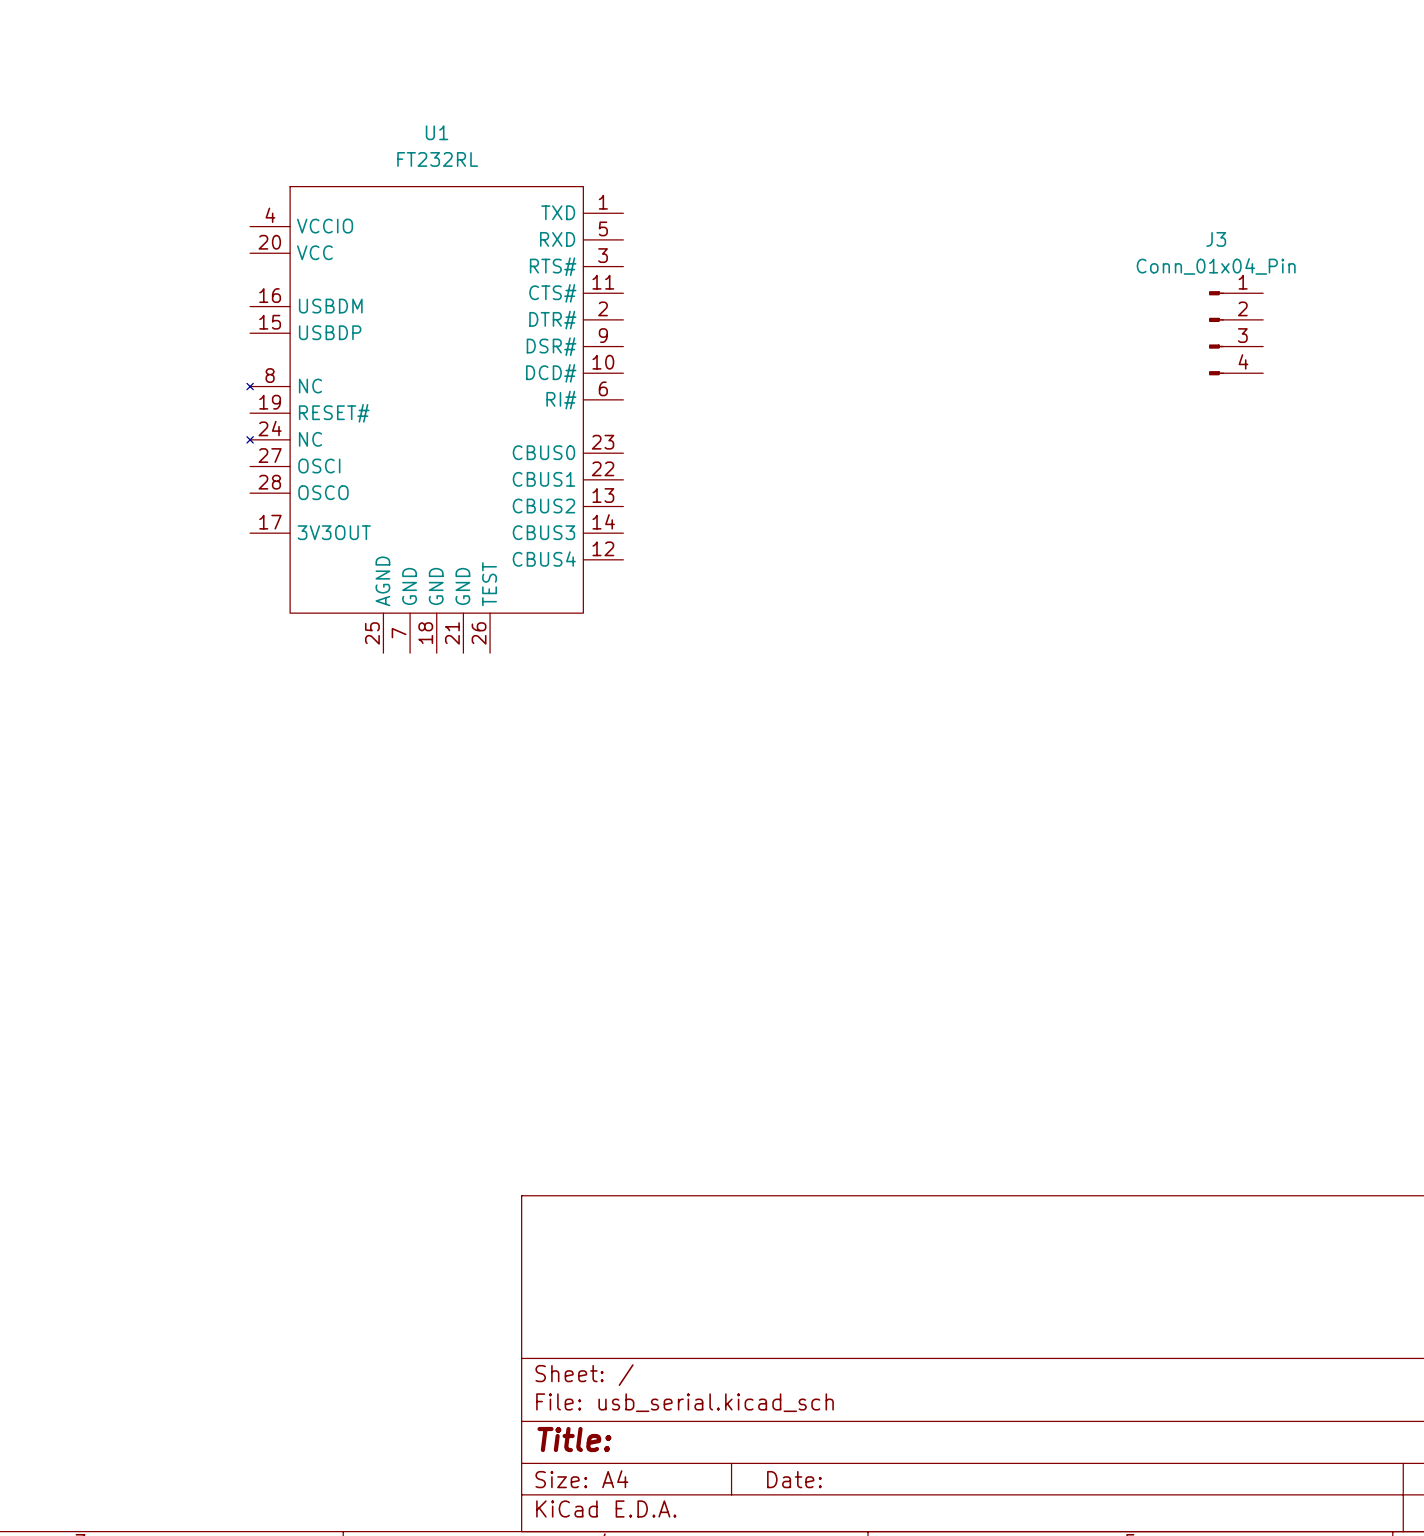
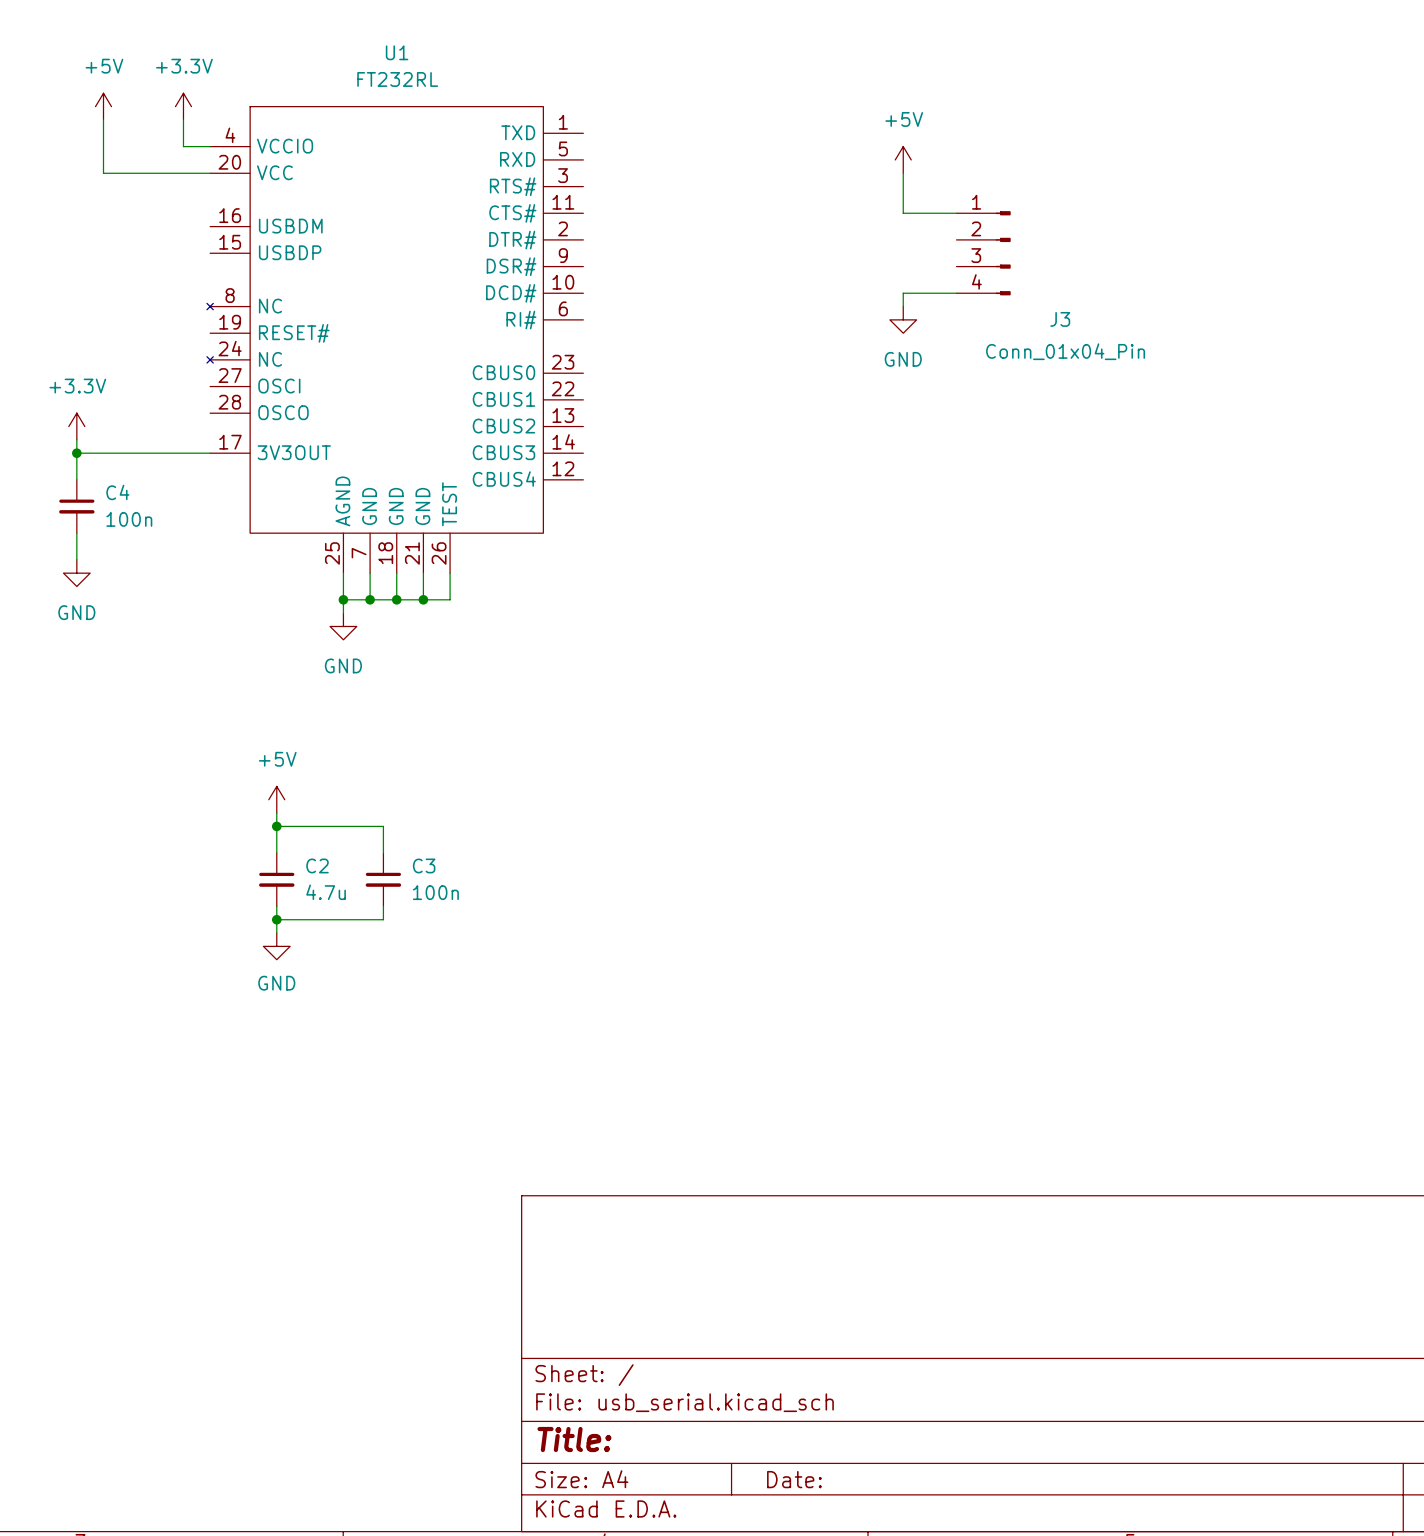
power symbol: none -> +5V (103, 106)
power symbol: none -> +3.3V (183, 106)
wire: none -> (103, 119) (103, 173) (210, 173)
wire: none -> (183, 119) (183, 146) (210, 146)
power symbol: none -> +5V (903, 159)
wire: none -> (903, 173) (903, 213) (956, 213)
J3 name position: J3 (1216, 239) -> J3 (1060, 319)
J3 value position: Conn_01x04_Pin (1216, 266) -> Conn_01x04_Pin (1065, 351)
wire: none -> (956, 293) (903, 293) (903, 306)
power symbol: none -> GND (903, 319)
J3 flip: as is (1216, 333) -> left-right (1003, 253)
J3 position: (1236, 333) -> (983, 253)
U1 position: (435, 419) -> (395, 339)
power symbol: none -> +3.3V (76, 426)
wire: none -> (76, 439) (76, 479)
wire: none -> (76, 453) (210, 453)
junction: none -> (76, 453)
C4: none -> 100n (76, 506)
wire: none -> (76, 533) (76, 559)
power symbol: none -> GND (76, 573)
wire: none -> (343, 573) (343, 613)
wire: none -> (370, 573) (370, 599)
wire: none -> (396, 573) (396, 599)
wire: none -> (423, 573) (423, 599)
wire: none -> (450, 573) (450, 599) (343, 599)
junction: none -> (343, 599)
junction: none -> (370, 599)
junction: none -> (396, 599)
junction: none -> (423, 599)
power symbol: none -> GND (343, 626)
power symbol: none -> +5V (276, 799)
wire: none -> (276, 813) (276, 853)
wire: none -> (276, 826) (383, 826) (383, 853)
junction: none -> (276, 826)
C2: none -> 4.7u (276, 879)
C3: none -> 100n (383, 879)
wire: none -> (276, 906) (276, 933)
wire: none -> (383, 906) (383, 919) (276, 919)
junction: none -> (276, 919)
power symbol: none -> GND (276, 946)

